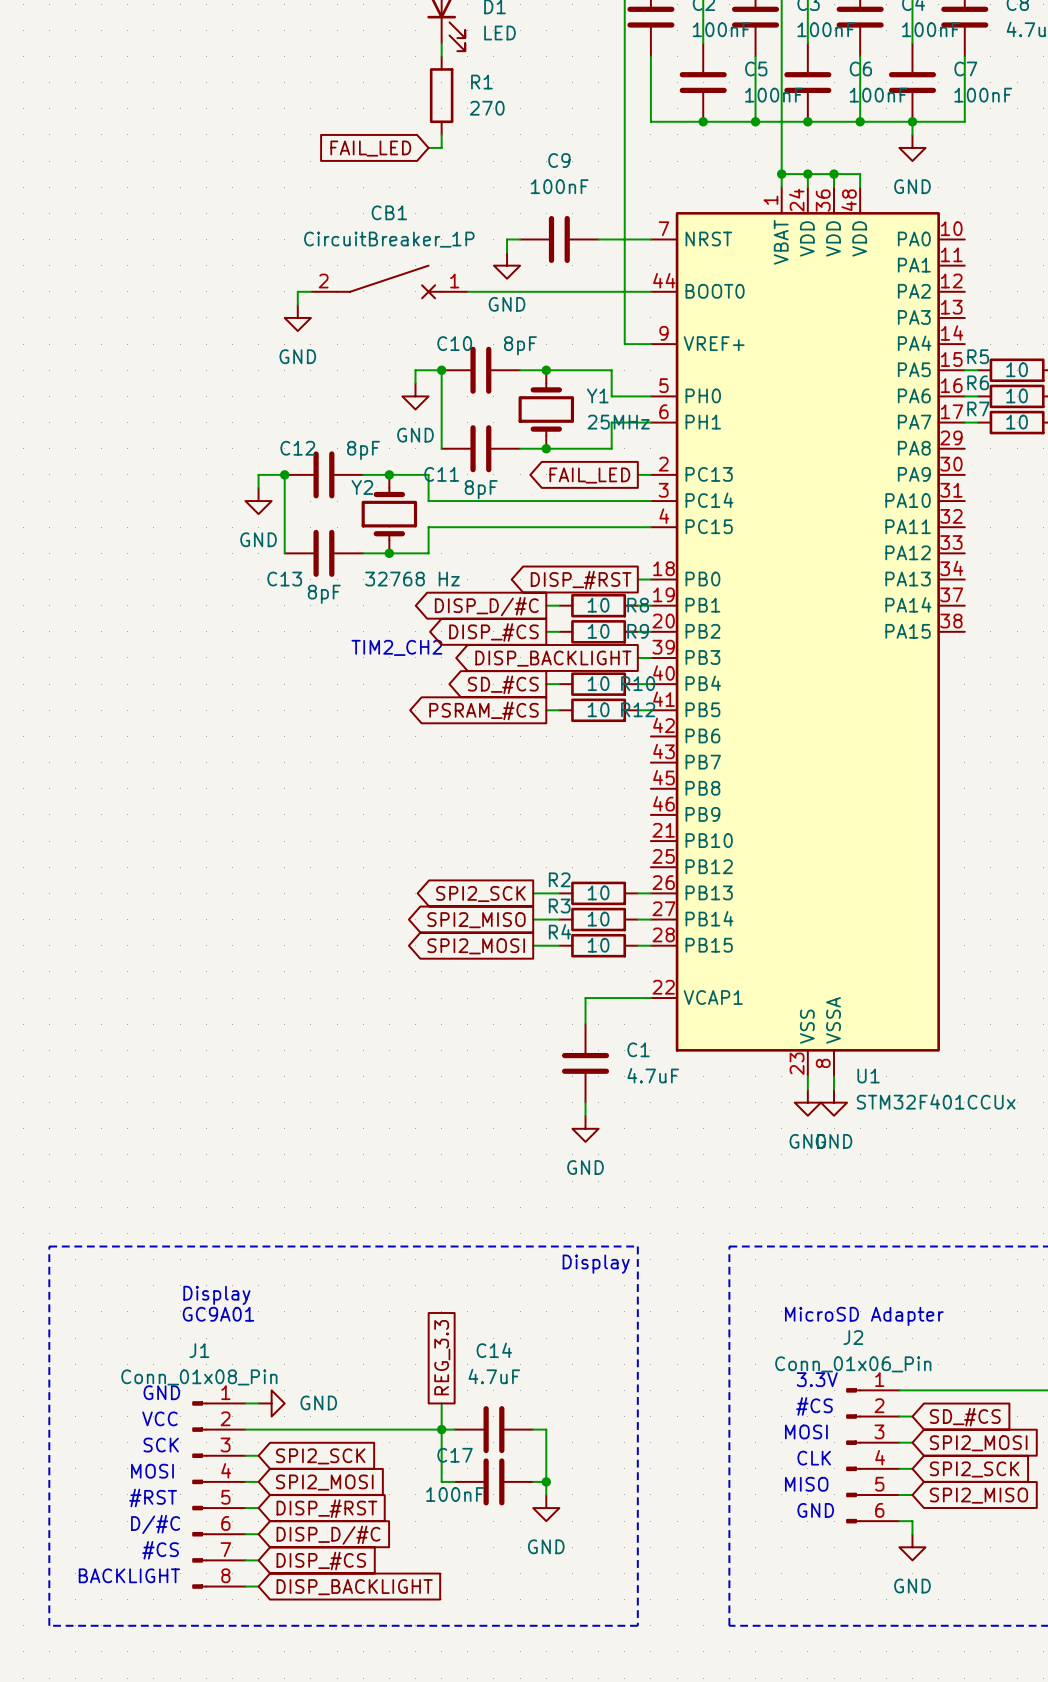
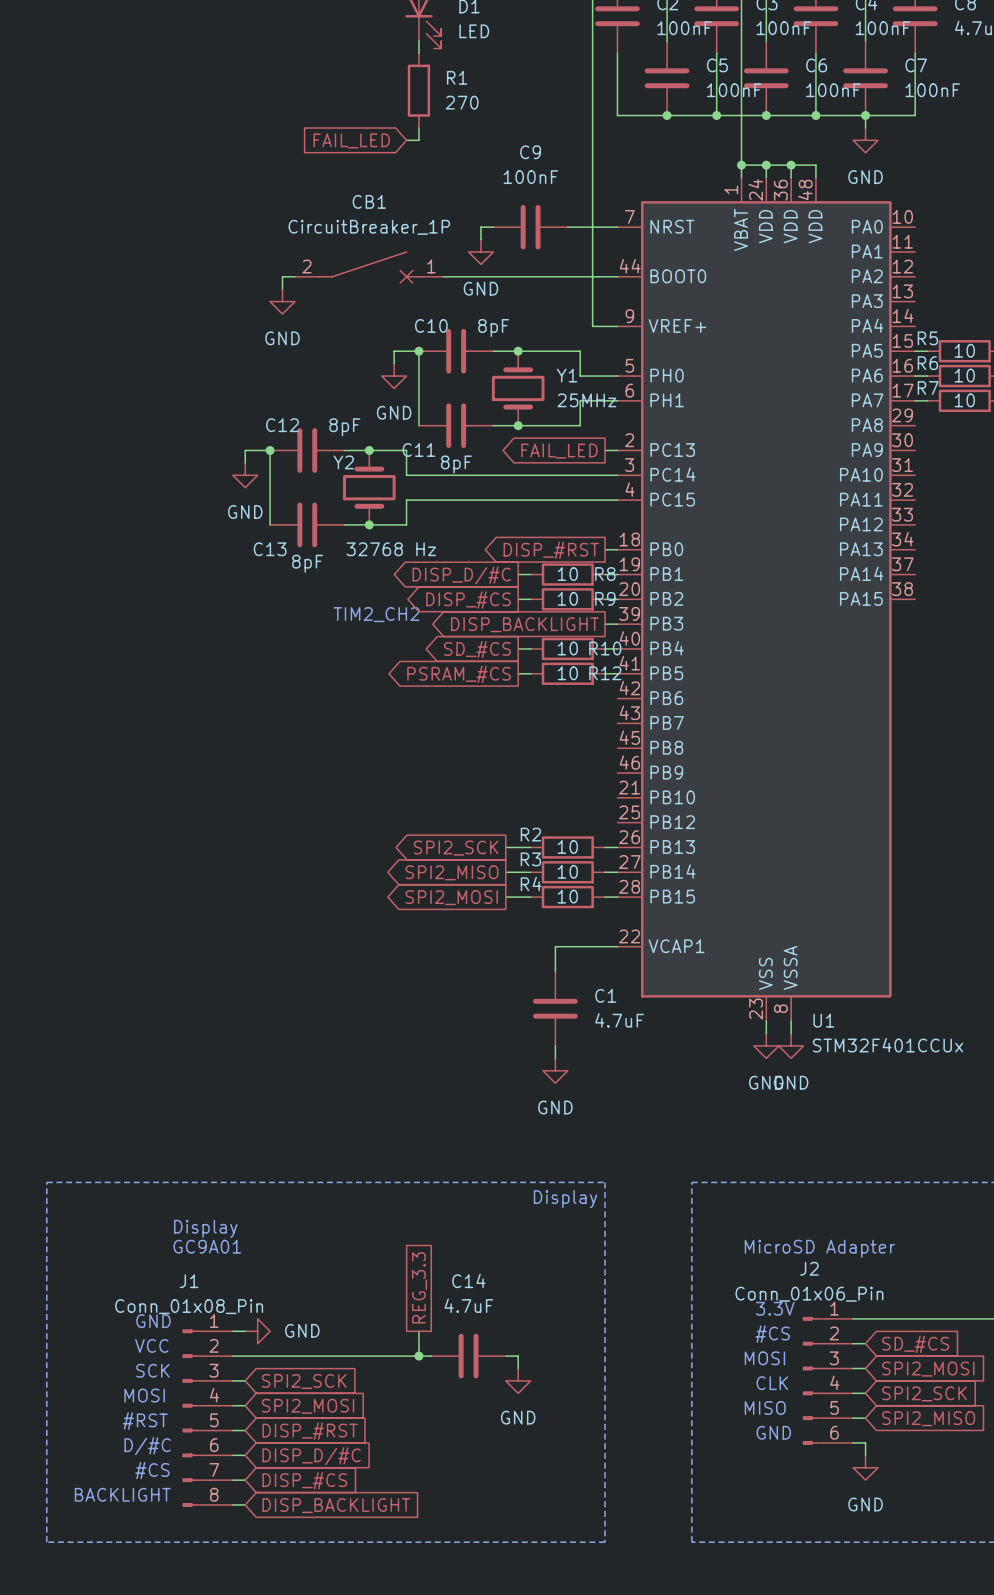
wire: (441, 1429) (441, 1481) (454, 1481) -> none
wire: (546, 1442) (546, 1494) -> none
C17: 100nF (493, 1481) -> none
wire: (533, 1481) (546, 1481) -> none
junction: (546, 1481) -> none
power symbol position: GND (546, 1508) -> GND (518, 1380)

